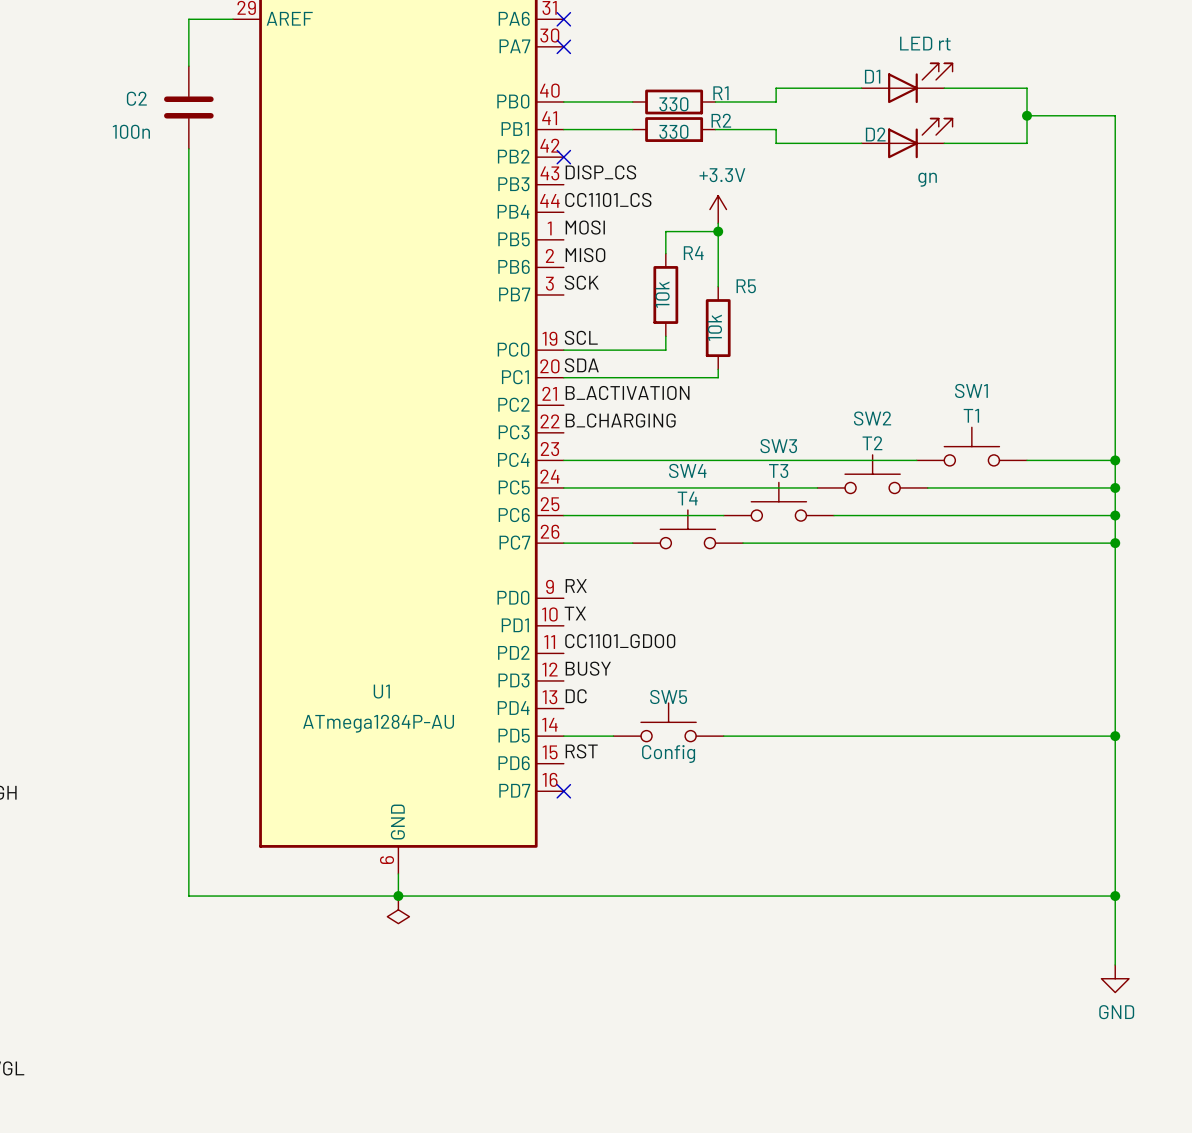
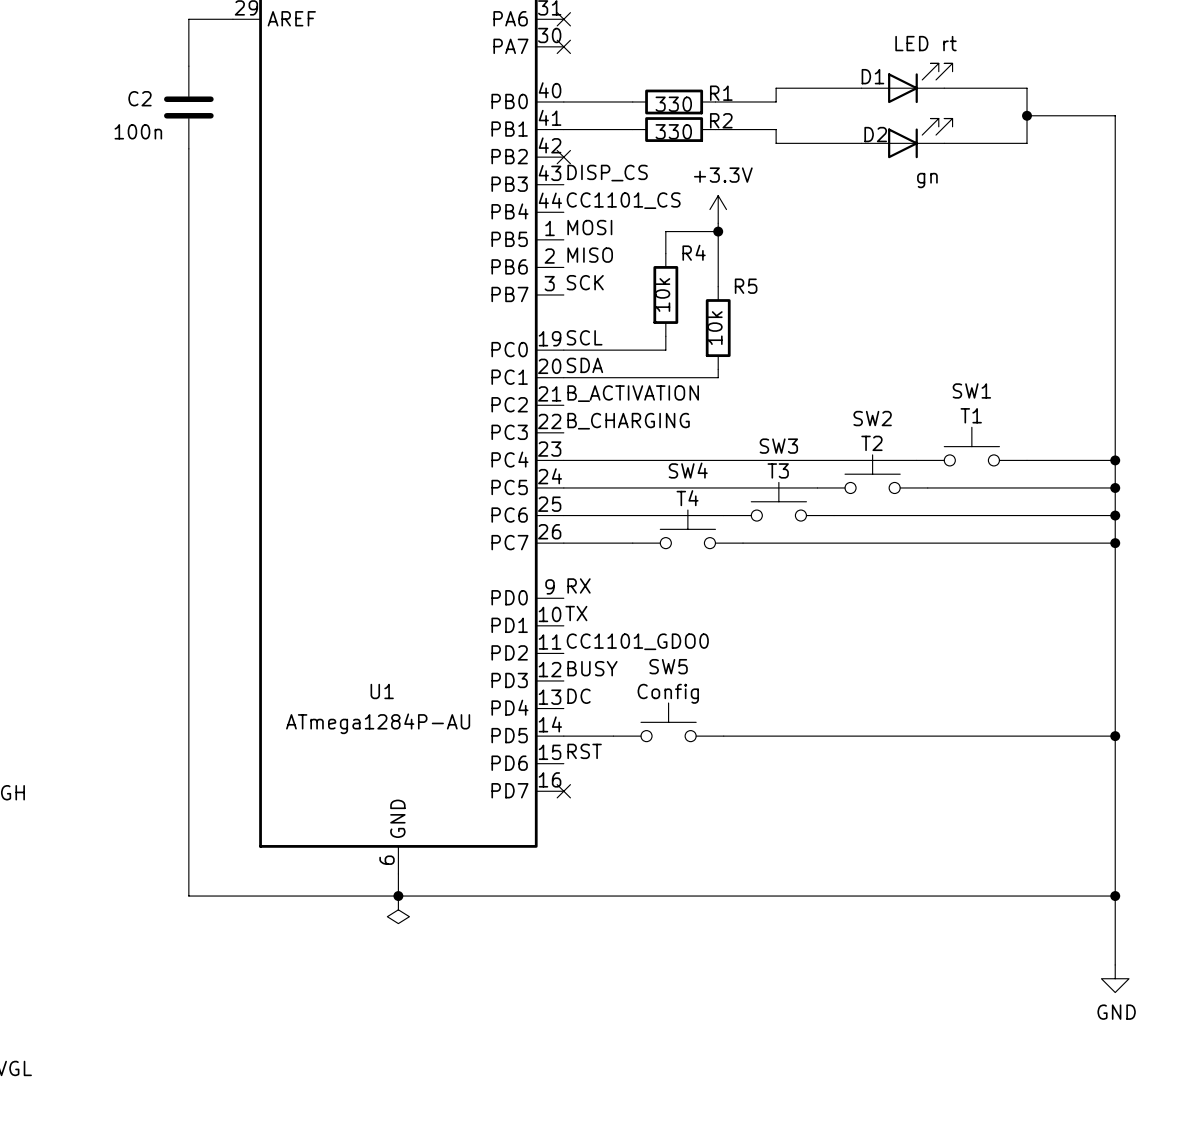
SW5 name position: SW5 (668, 697) -> SW5 (668, 666)
SW5 value position: Config (668, 754) -> Config (668, 693)

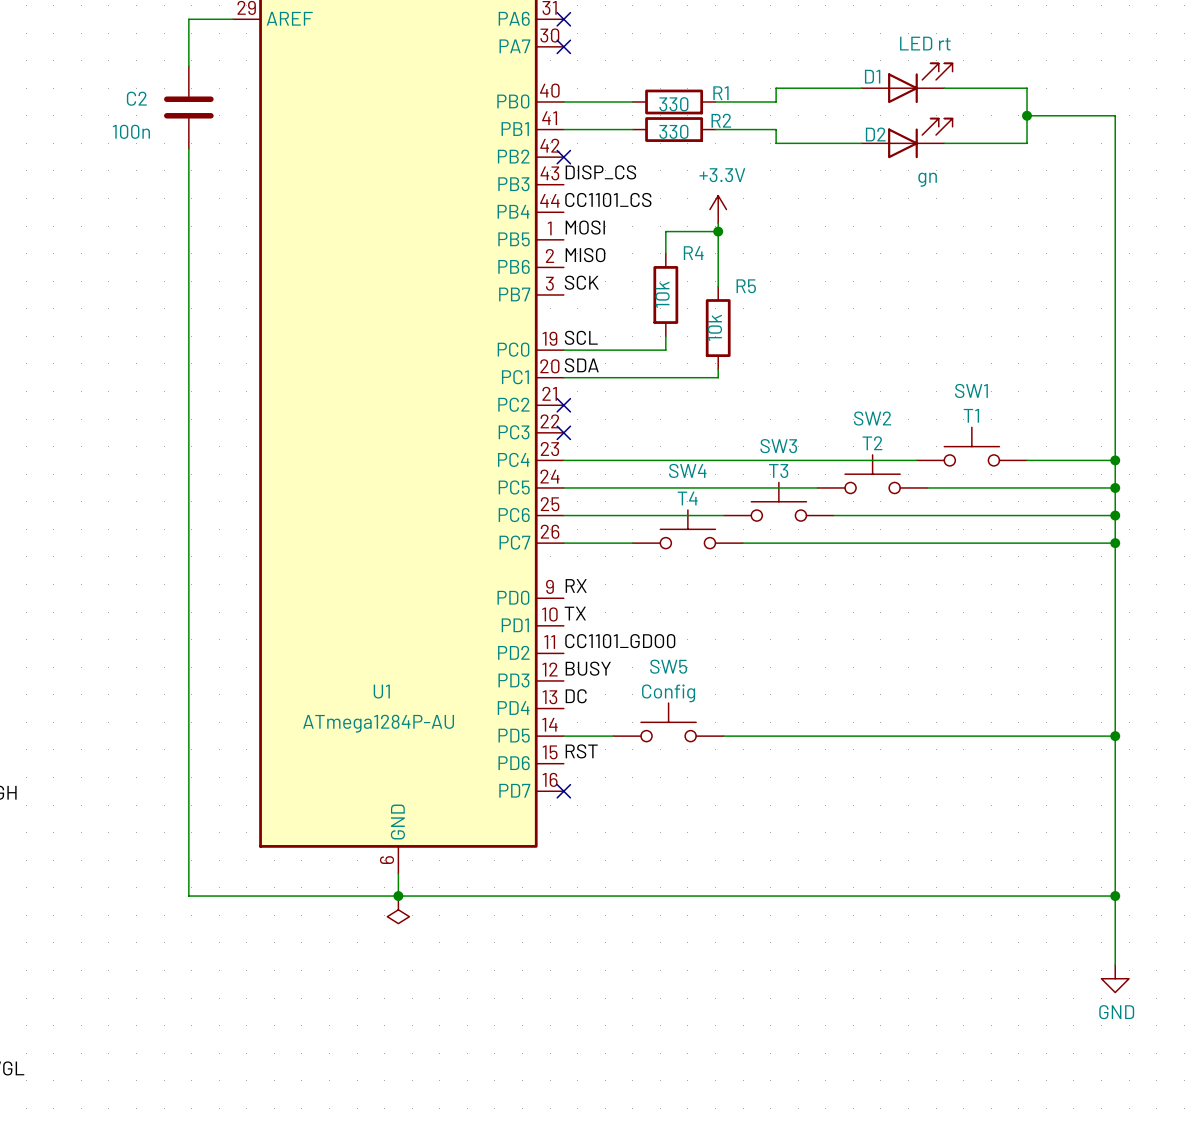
label: B_ACTIVATION (633, 393) -> none
no-connect mark: none -> (563, 405)
label: B_CHARGING (628, 421) -> none
no-connect mark: none -> (563, 432)

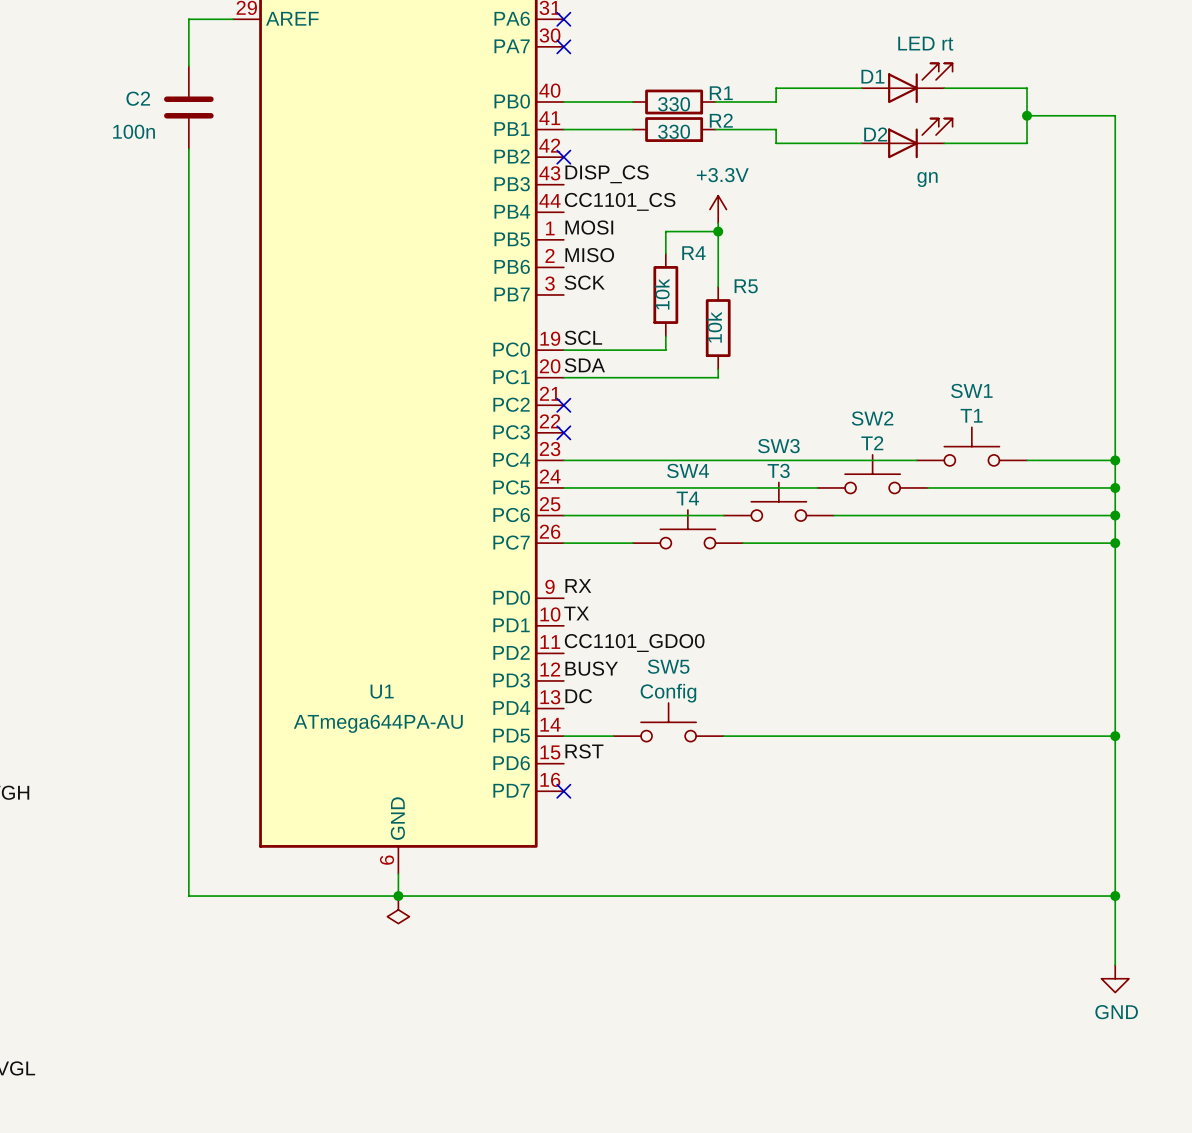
U1 value: ATmega1284P-AU (378, 723) -> ATmega644PA-AU (378, 723)

